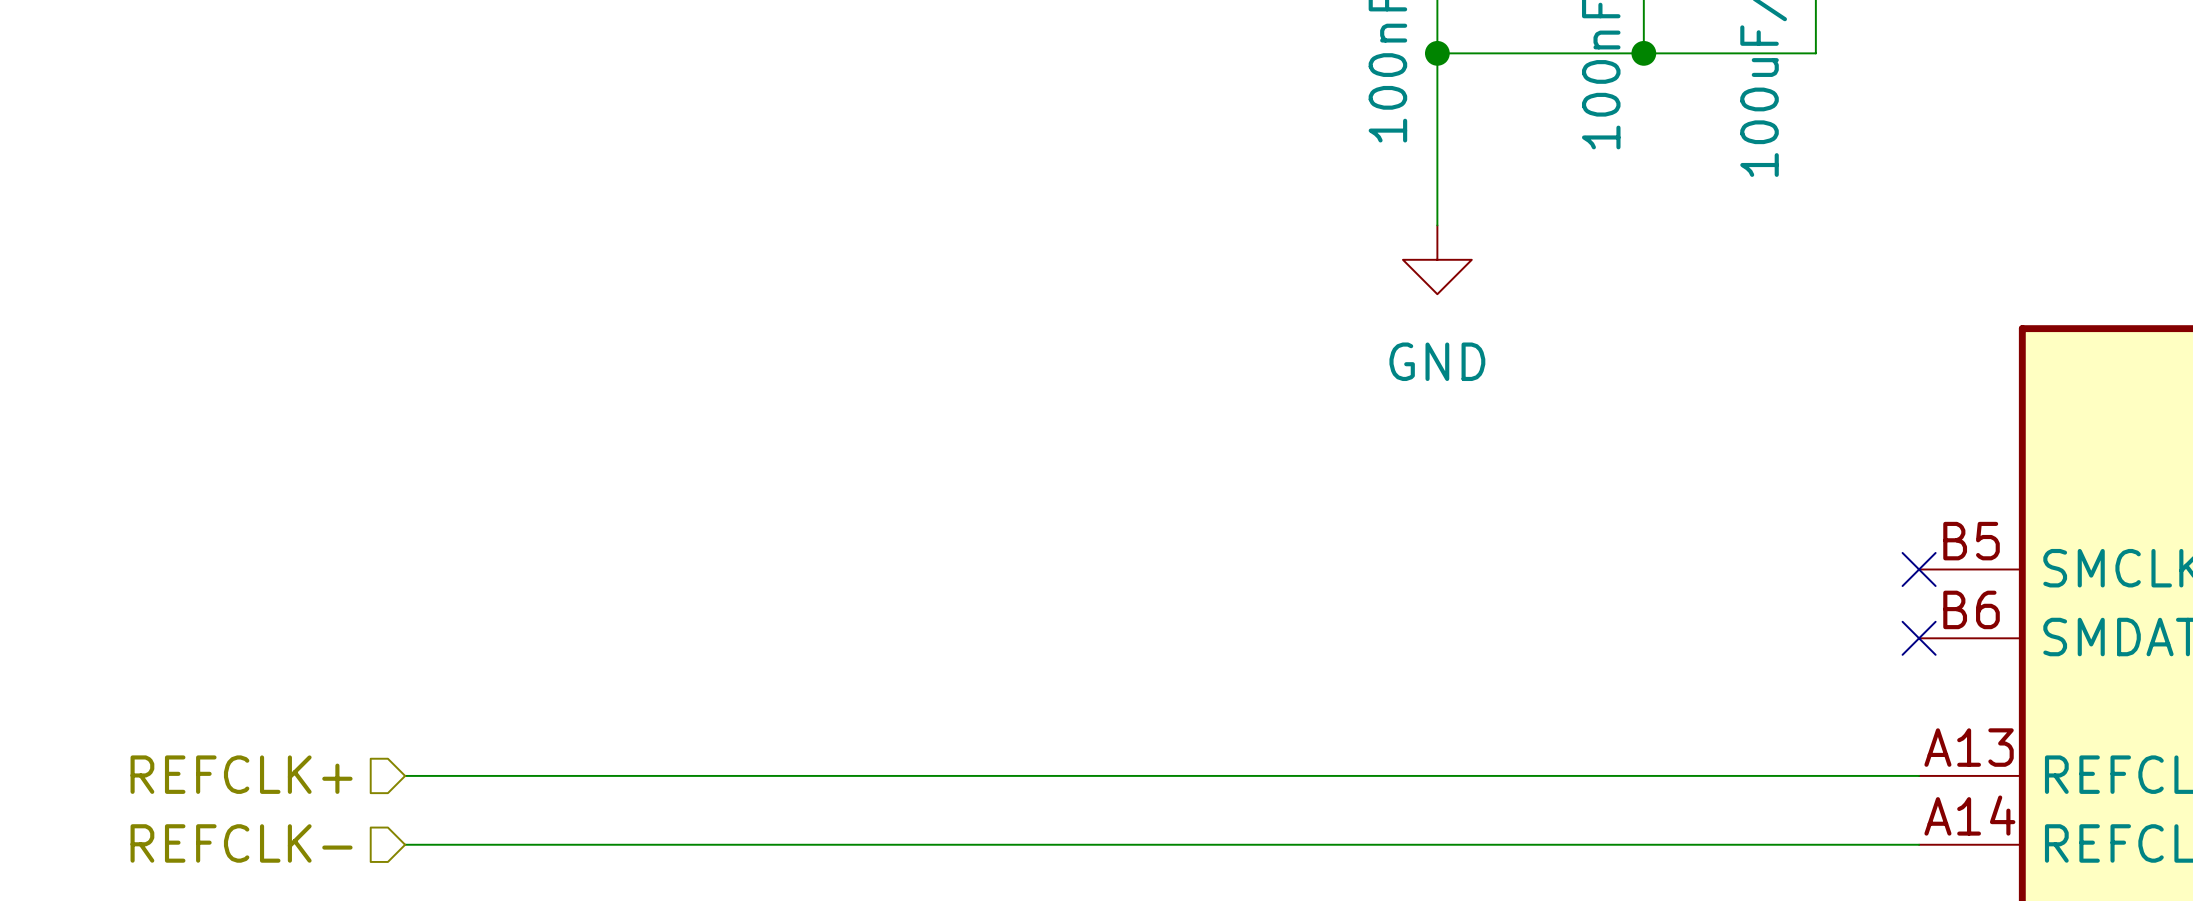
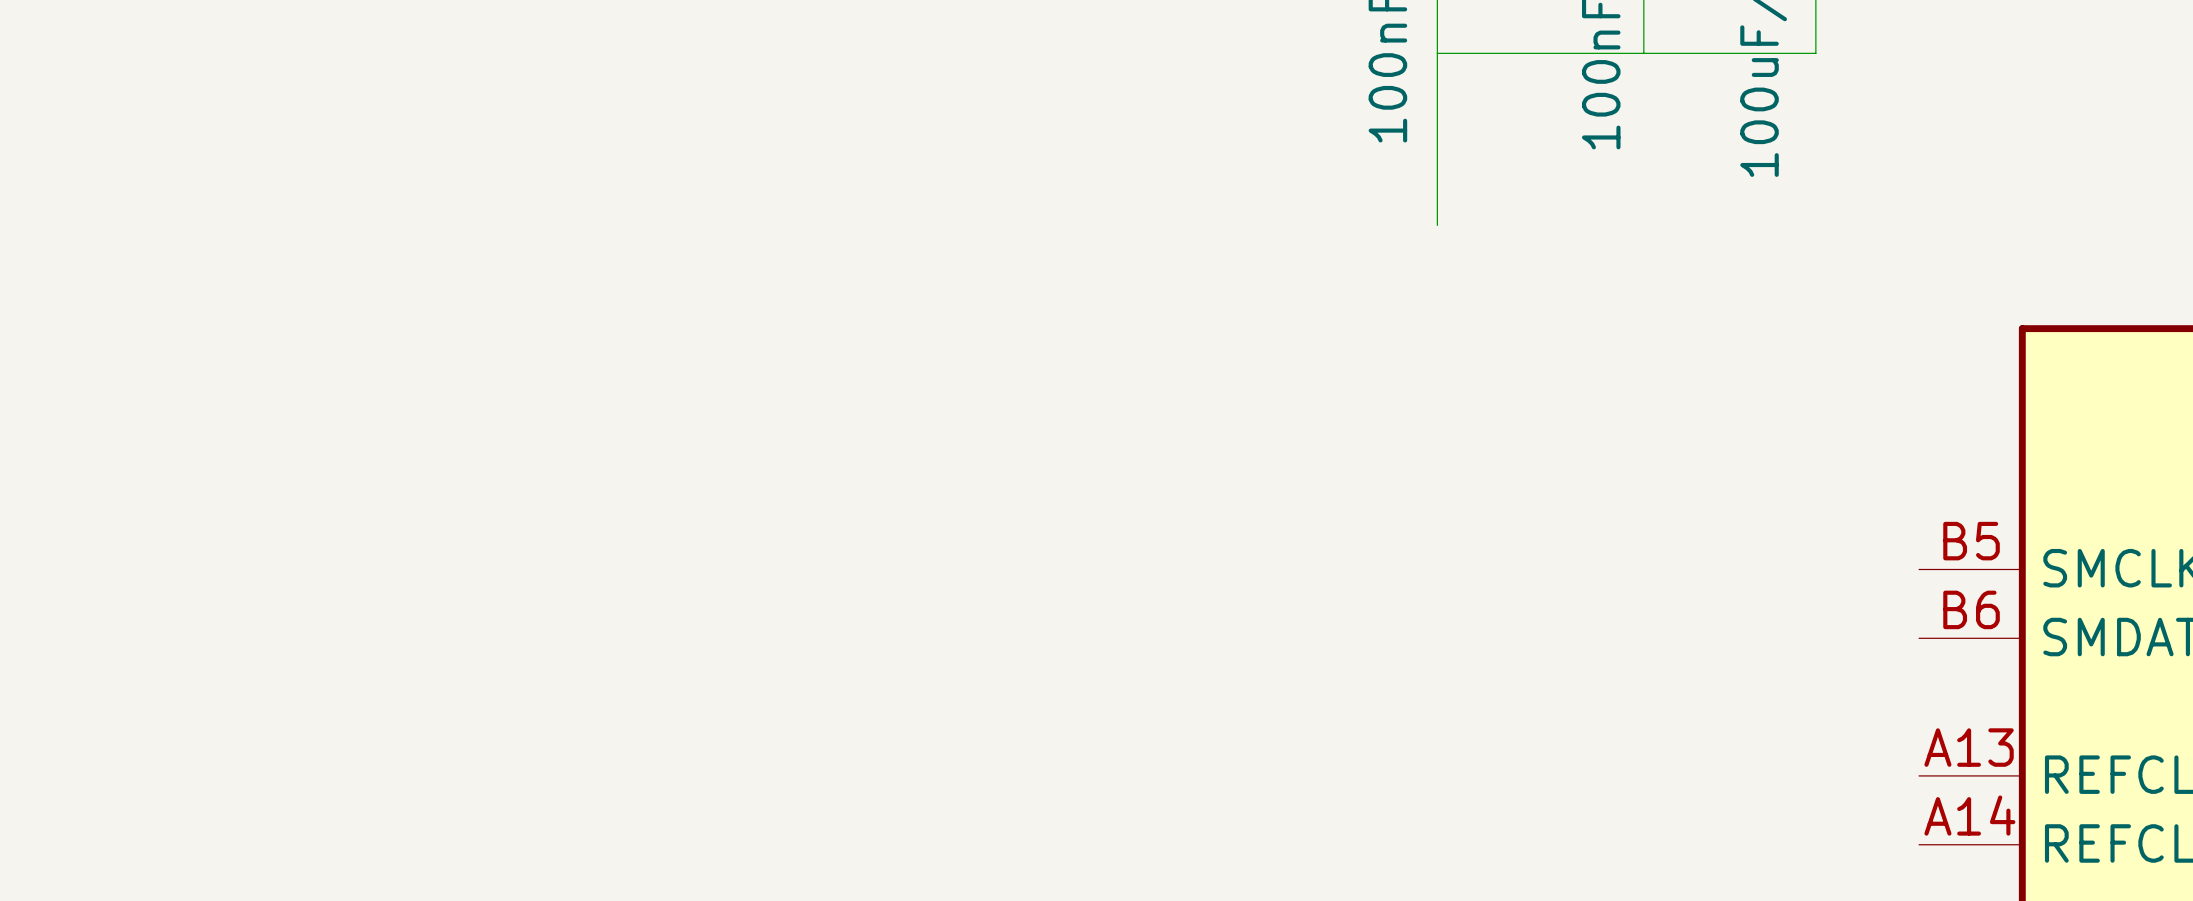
junction: (1437, 53) -> none
junction: (1643, 53) -> none
power symbol: GND (1437, 259) -> none
no-connect mark: (1919, 569) -> none
no-connect mark: (1919, 638) -> none
hierarchical label: REFCLK+ (241, 774) -> none
wire: (405, 775) (1919, 775) -> none
hierarchical label: REFCLK- (241, 843) -> none
wire: (405, 844) (1919, 844) -> none

